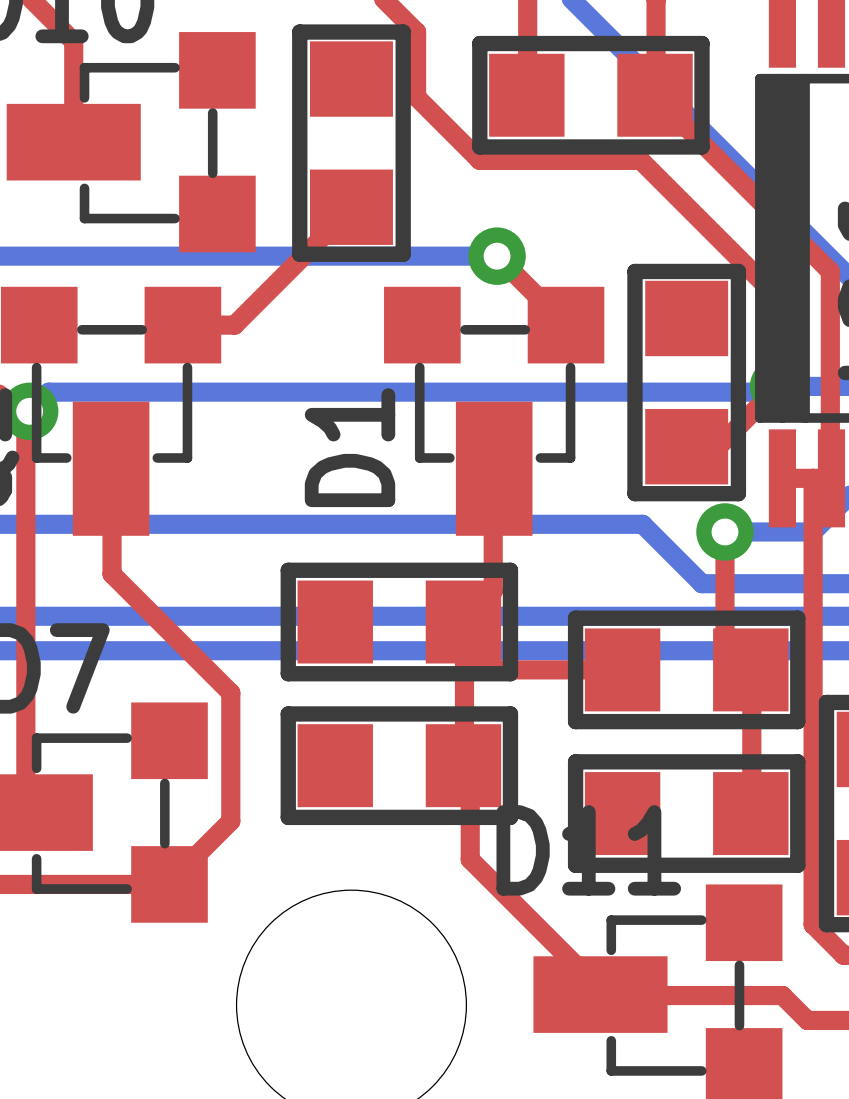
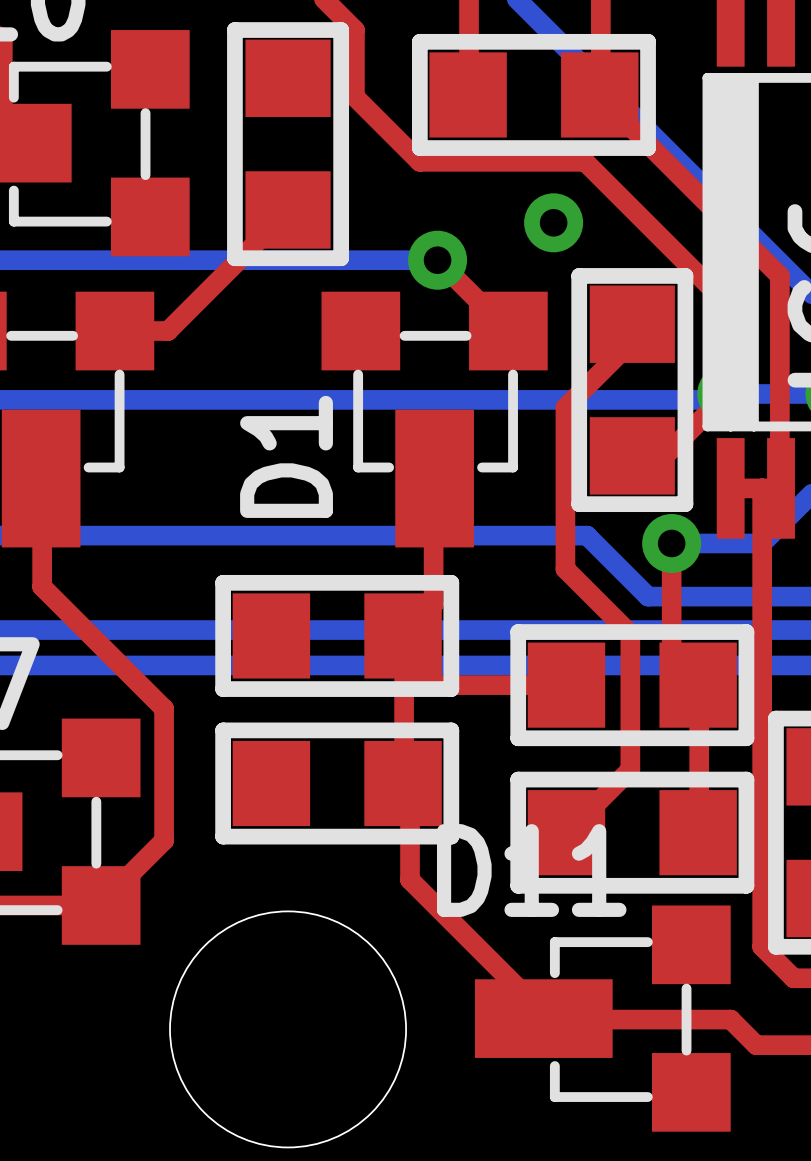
via: none -> (553, 222)
top track: none -> (632, 324) (632, 340) (565, 407) (565, 569) (630, 633) (630, 769) (567, 832)

